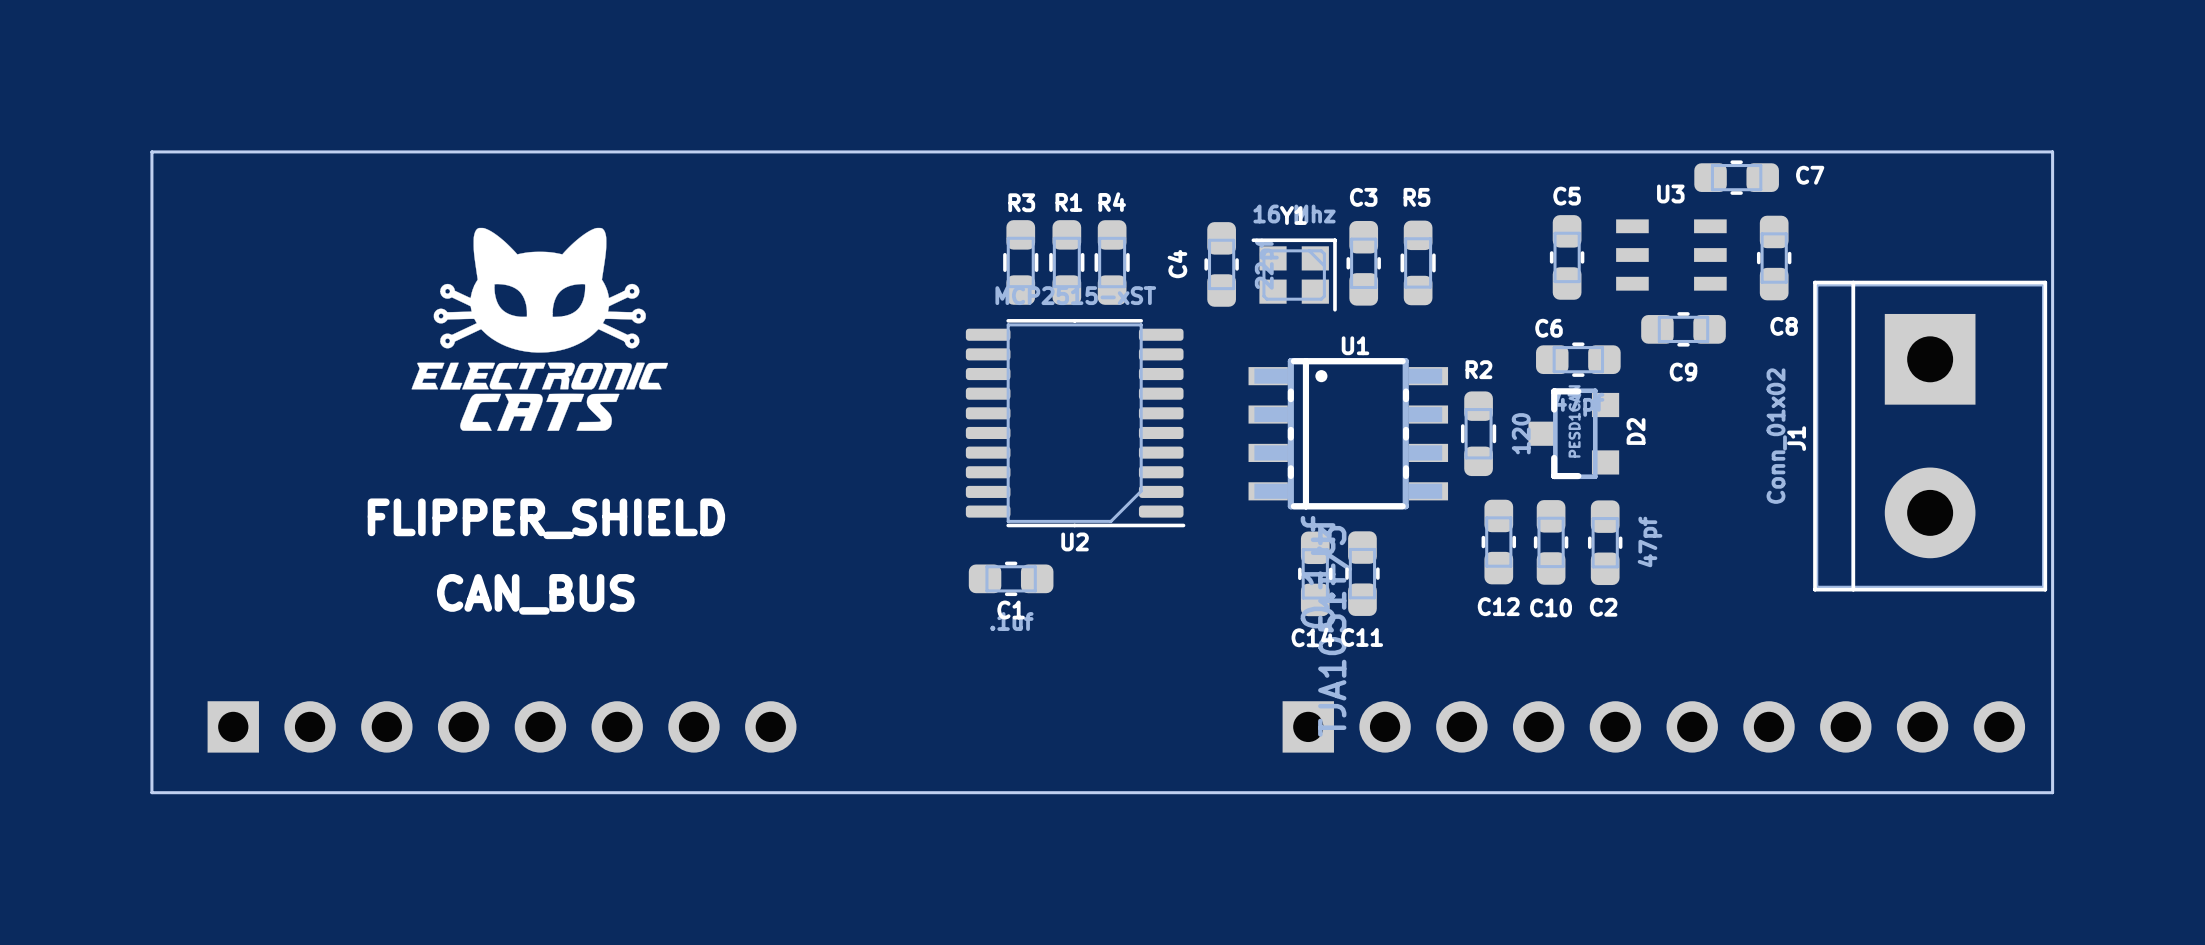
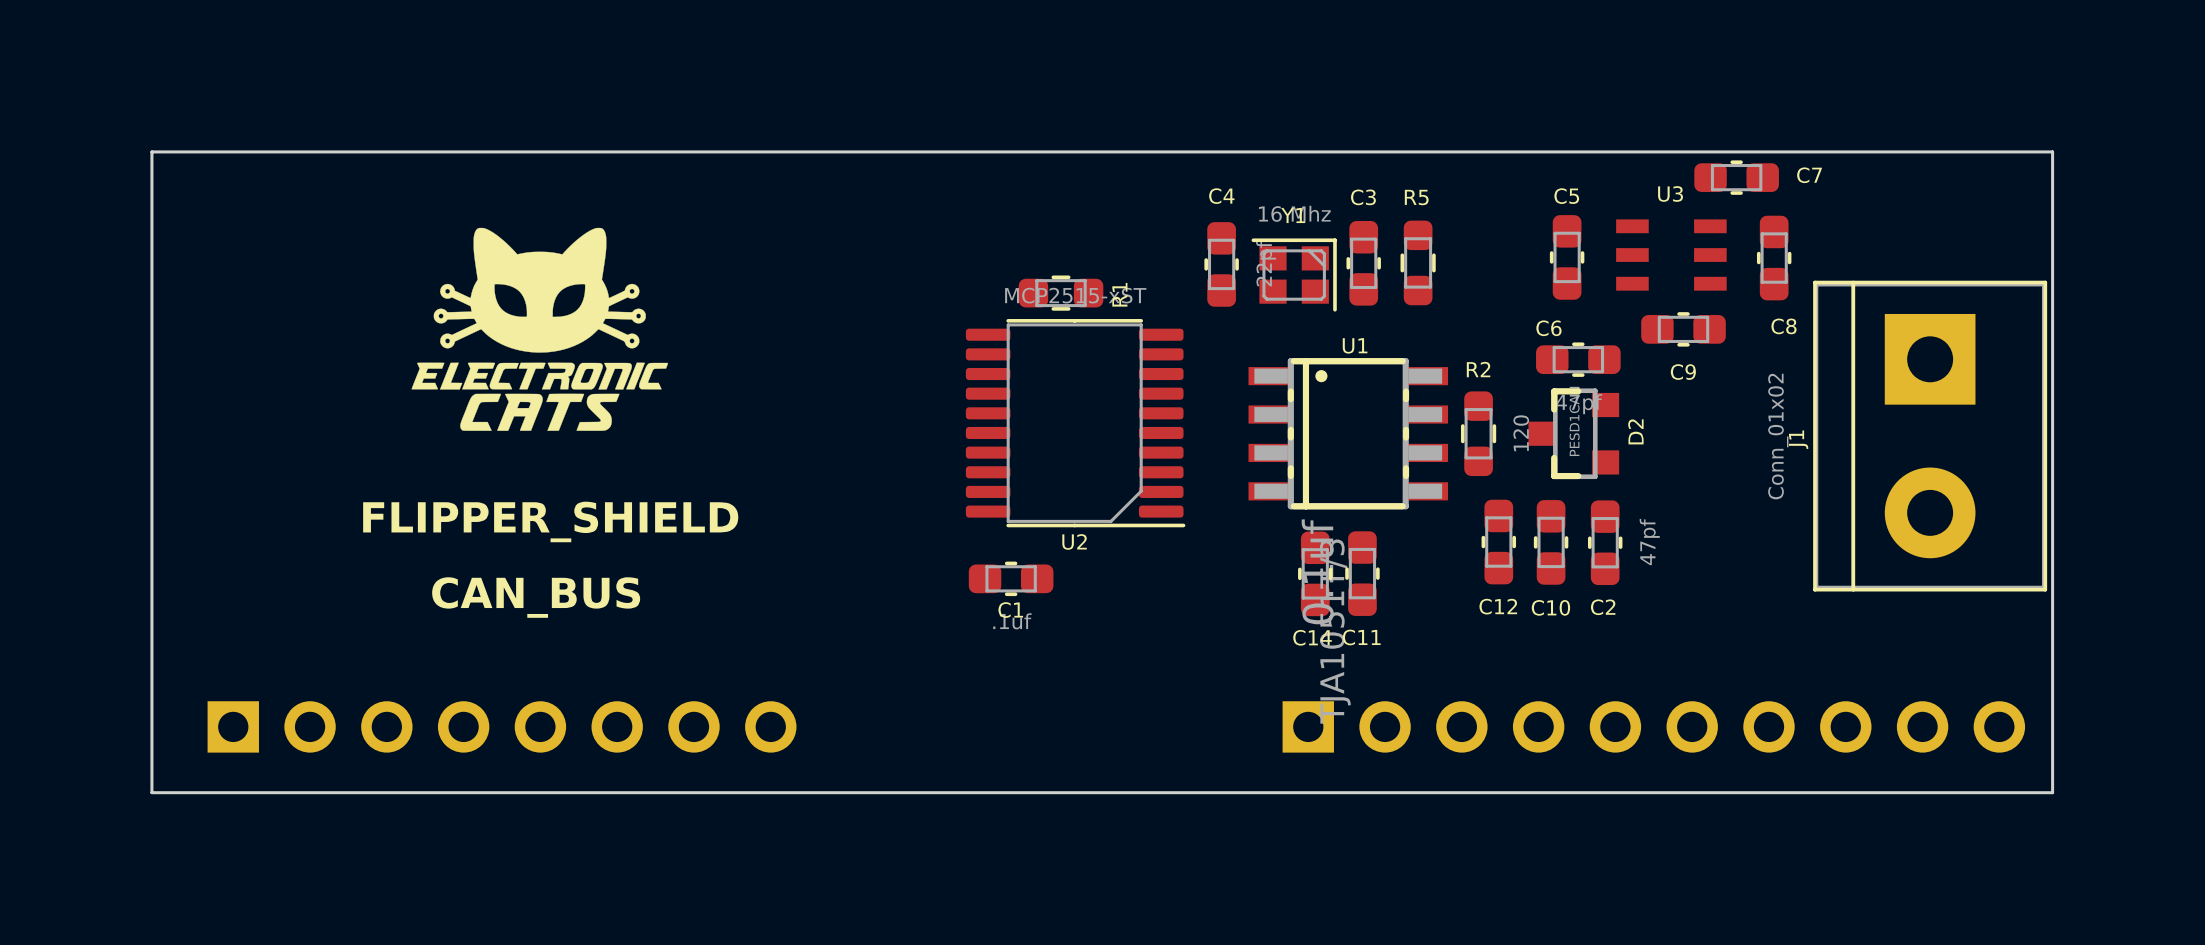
R3: (1020, 262) -> none
R1 rotation: 0° (1066, 262) -> 90° clockwise (1060, 293)
R4: (1112, 262) -> none
C4 name rotation: 0° (1177, 264) -> 90° clockwise (1221, 196)
C4 name position: C4 (1177, 264) -> C4 (1221, 196)

